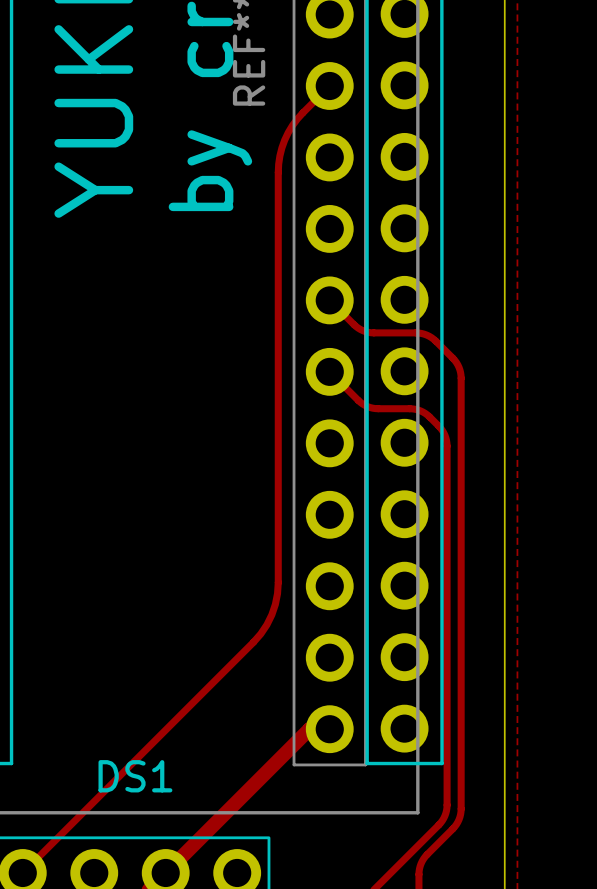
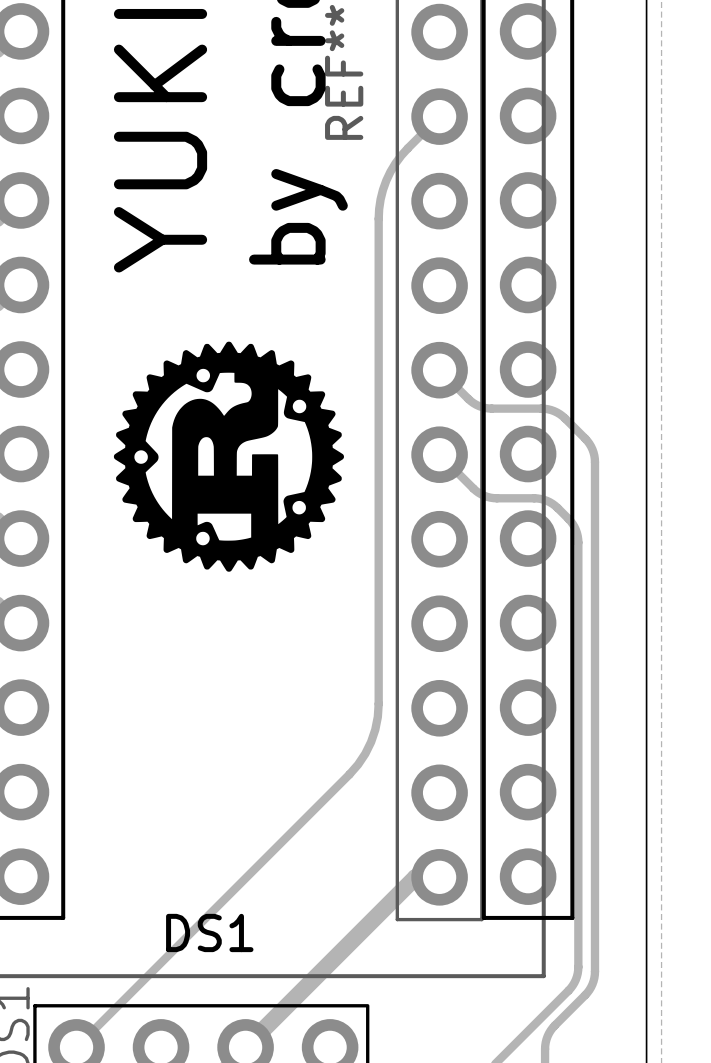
drawing: none -> [113, 341, 344, 572]

